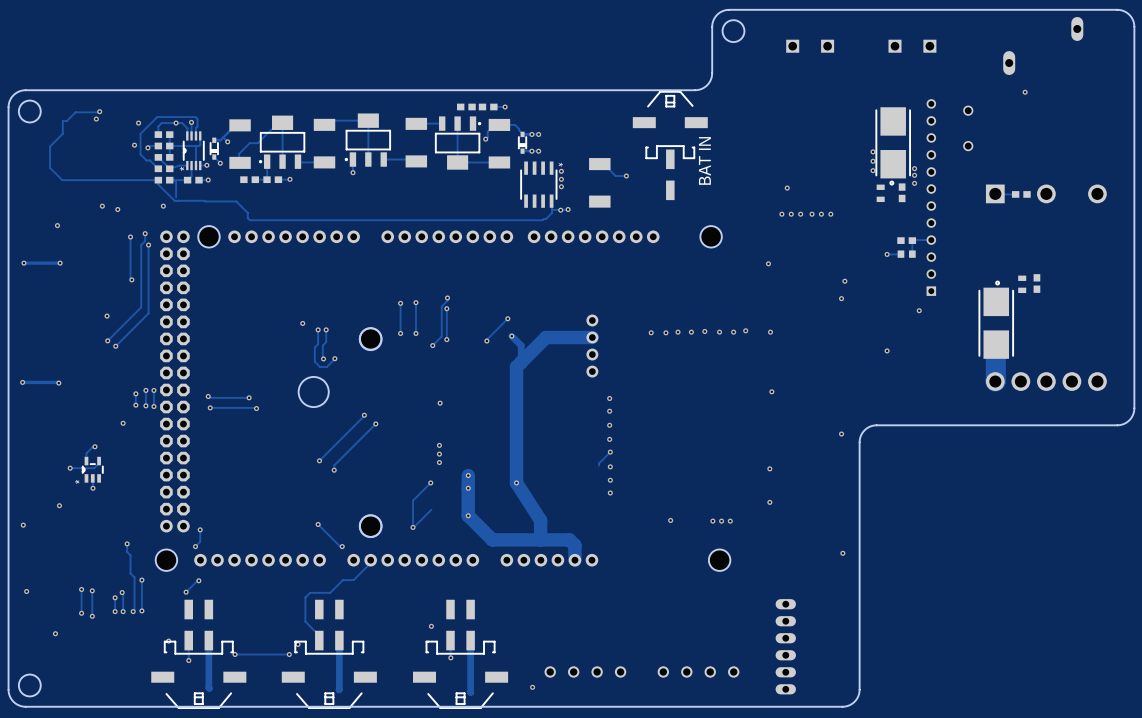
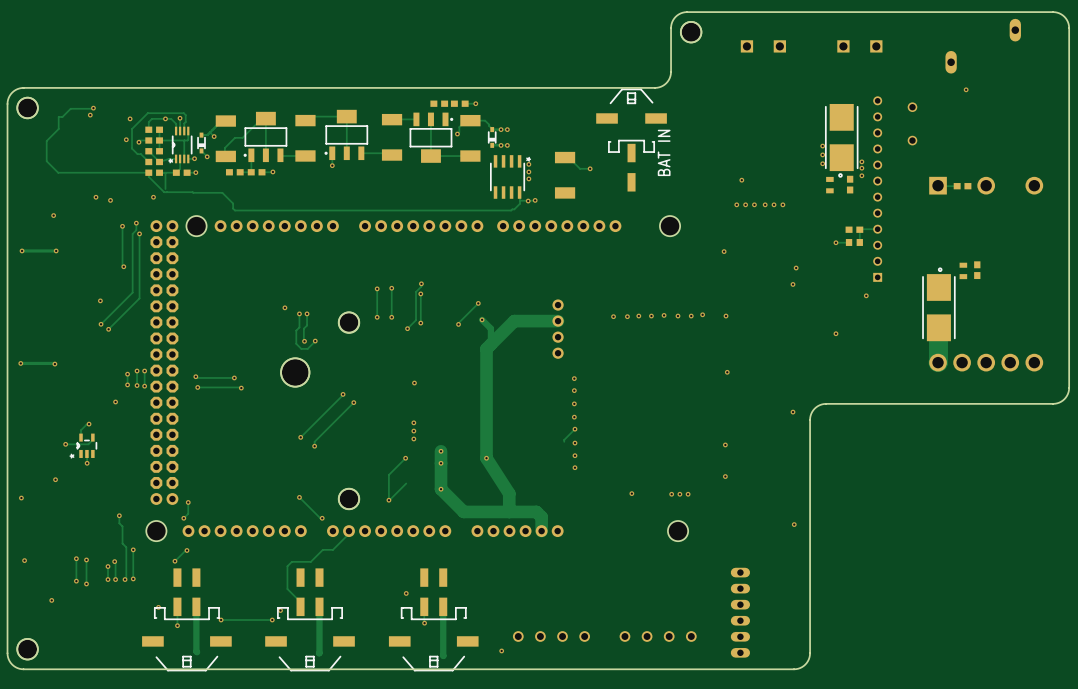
hole: none -> (691, 32)
hole: none -> (27, 107)
hole: none -> (295, 372)
hole: none -> (27, 649)

